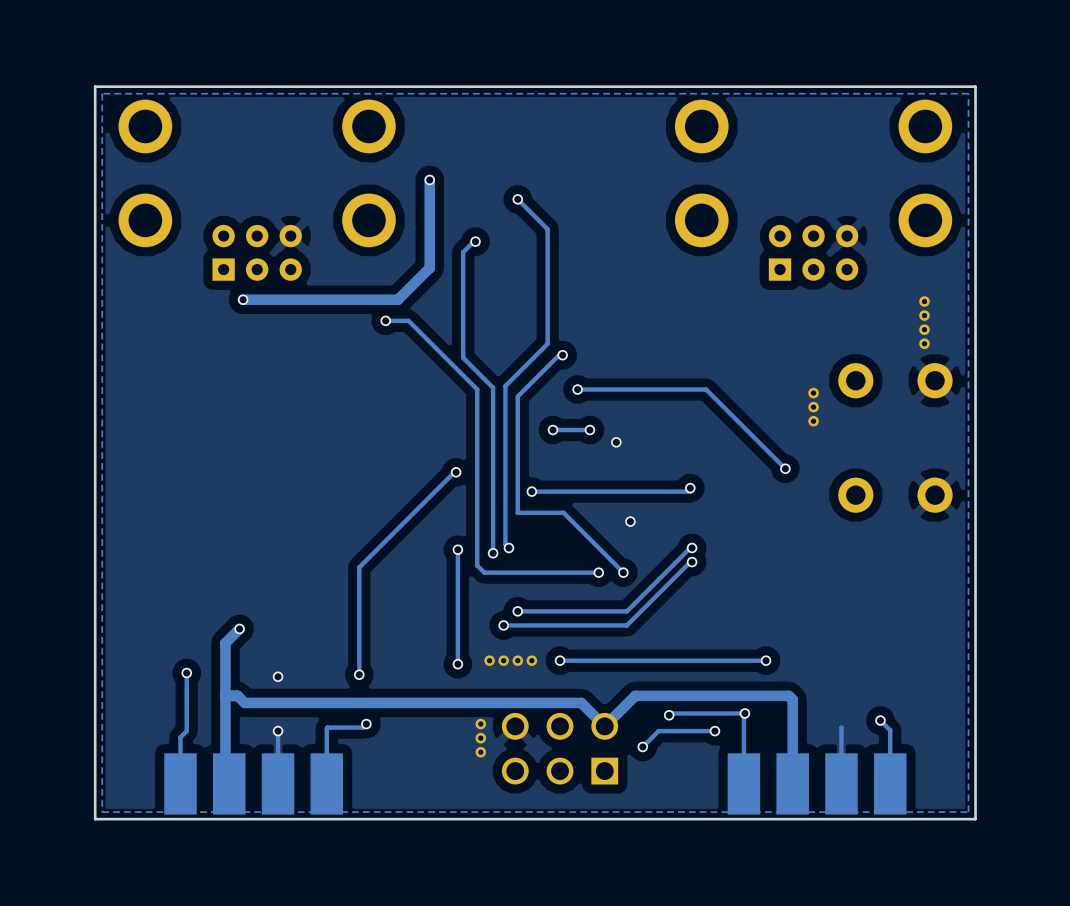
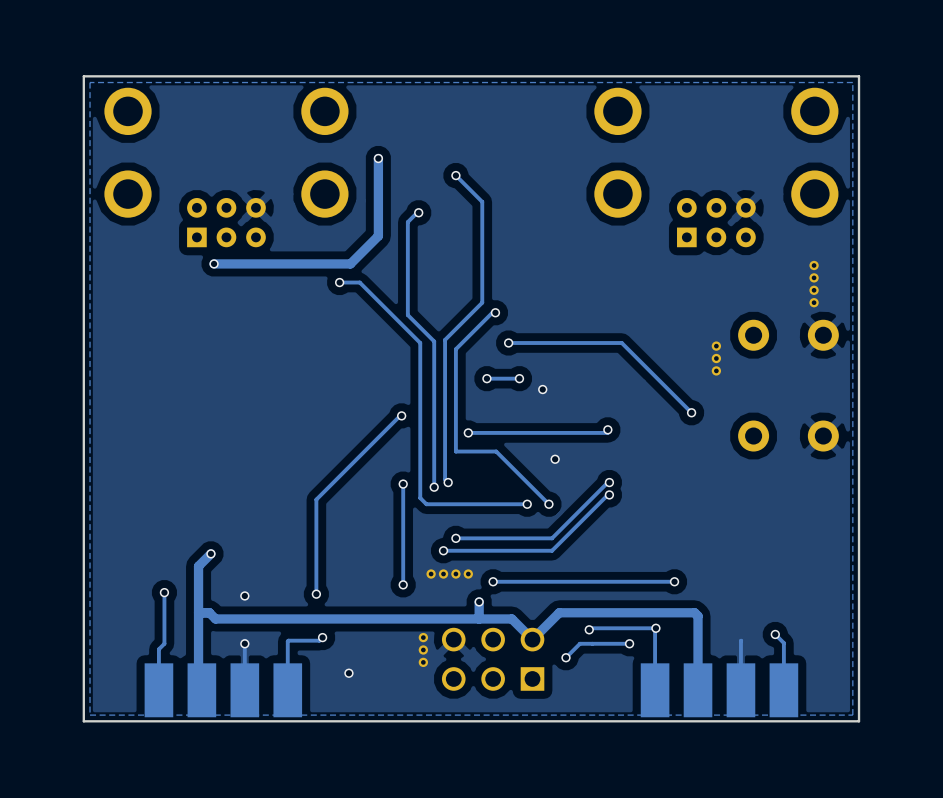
part: none -> (431, 574)
part: none -> (443, 574)
part: none -> (455, 574)
part: none -> (468, 574)
part: (489, 660) -> none
part: (503, 660) -> none
part: (517, 660) -> none
part: (531, 660) -> none
track: none -> (479, 601) (479, 618)
via: none -> (479, 601)
via: none -> (348, 673)

